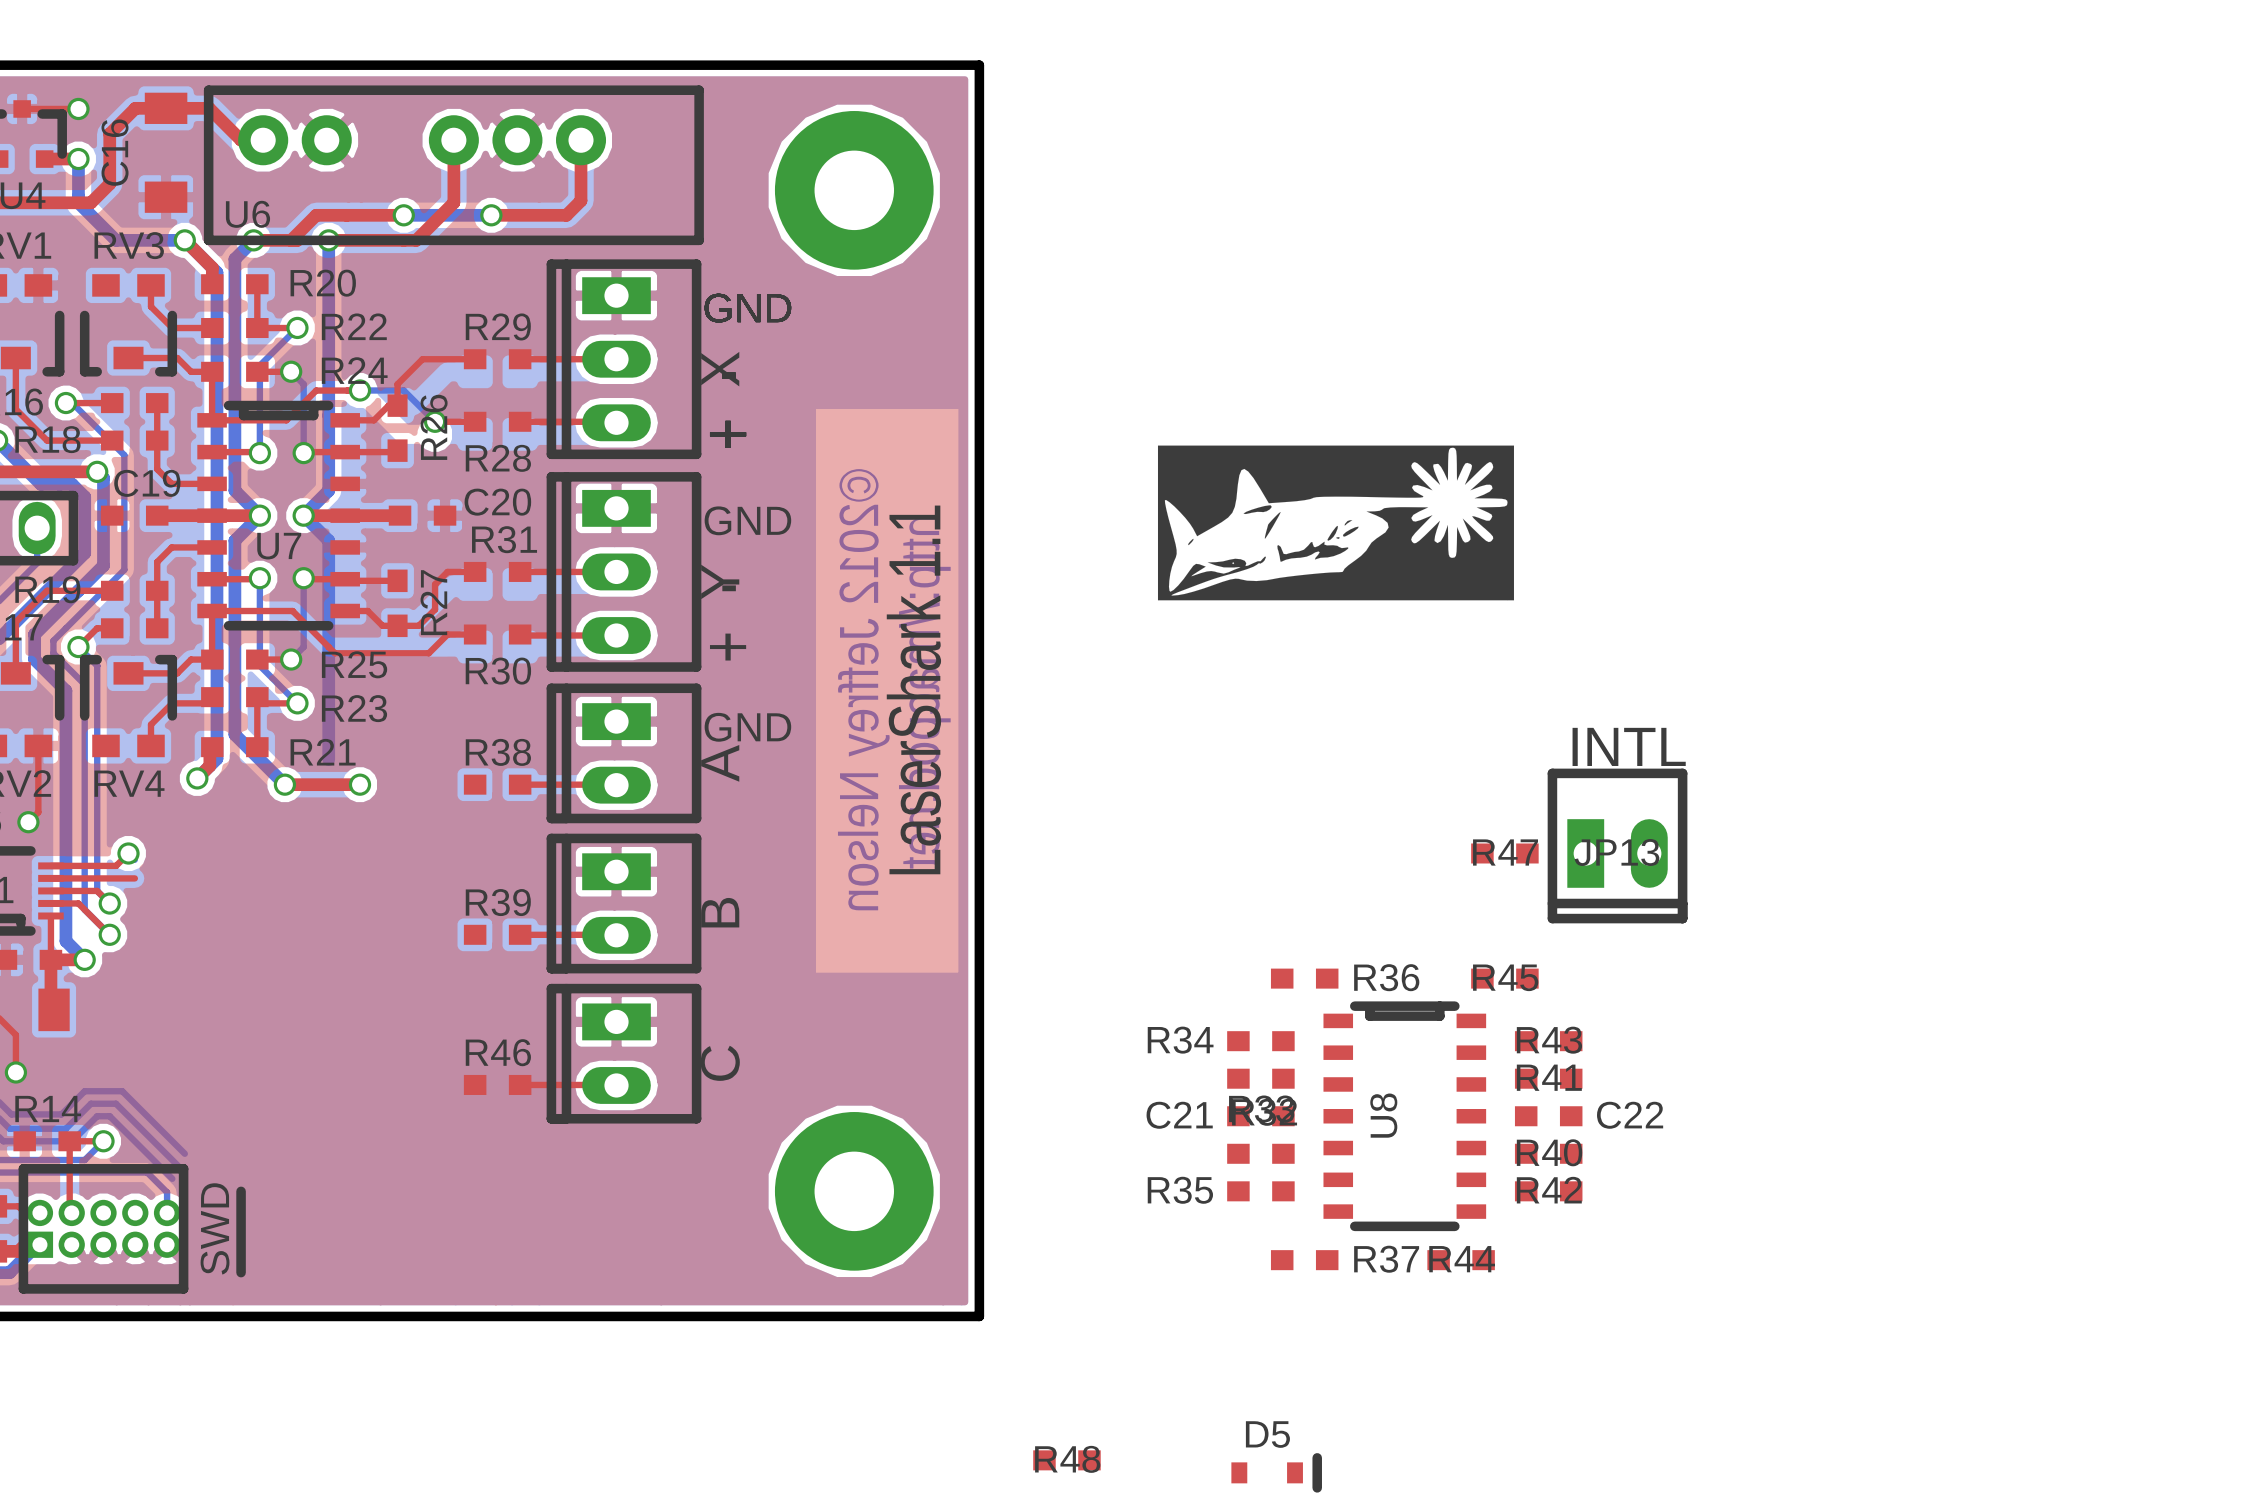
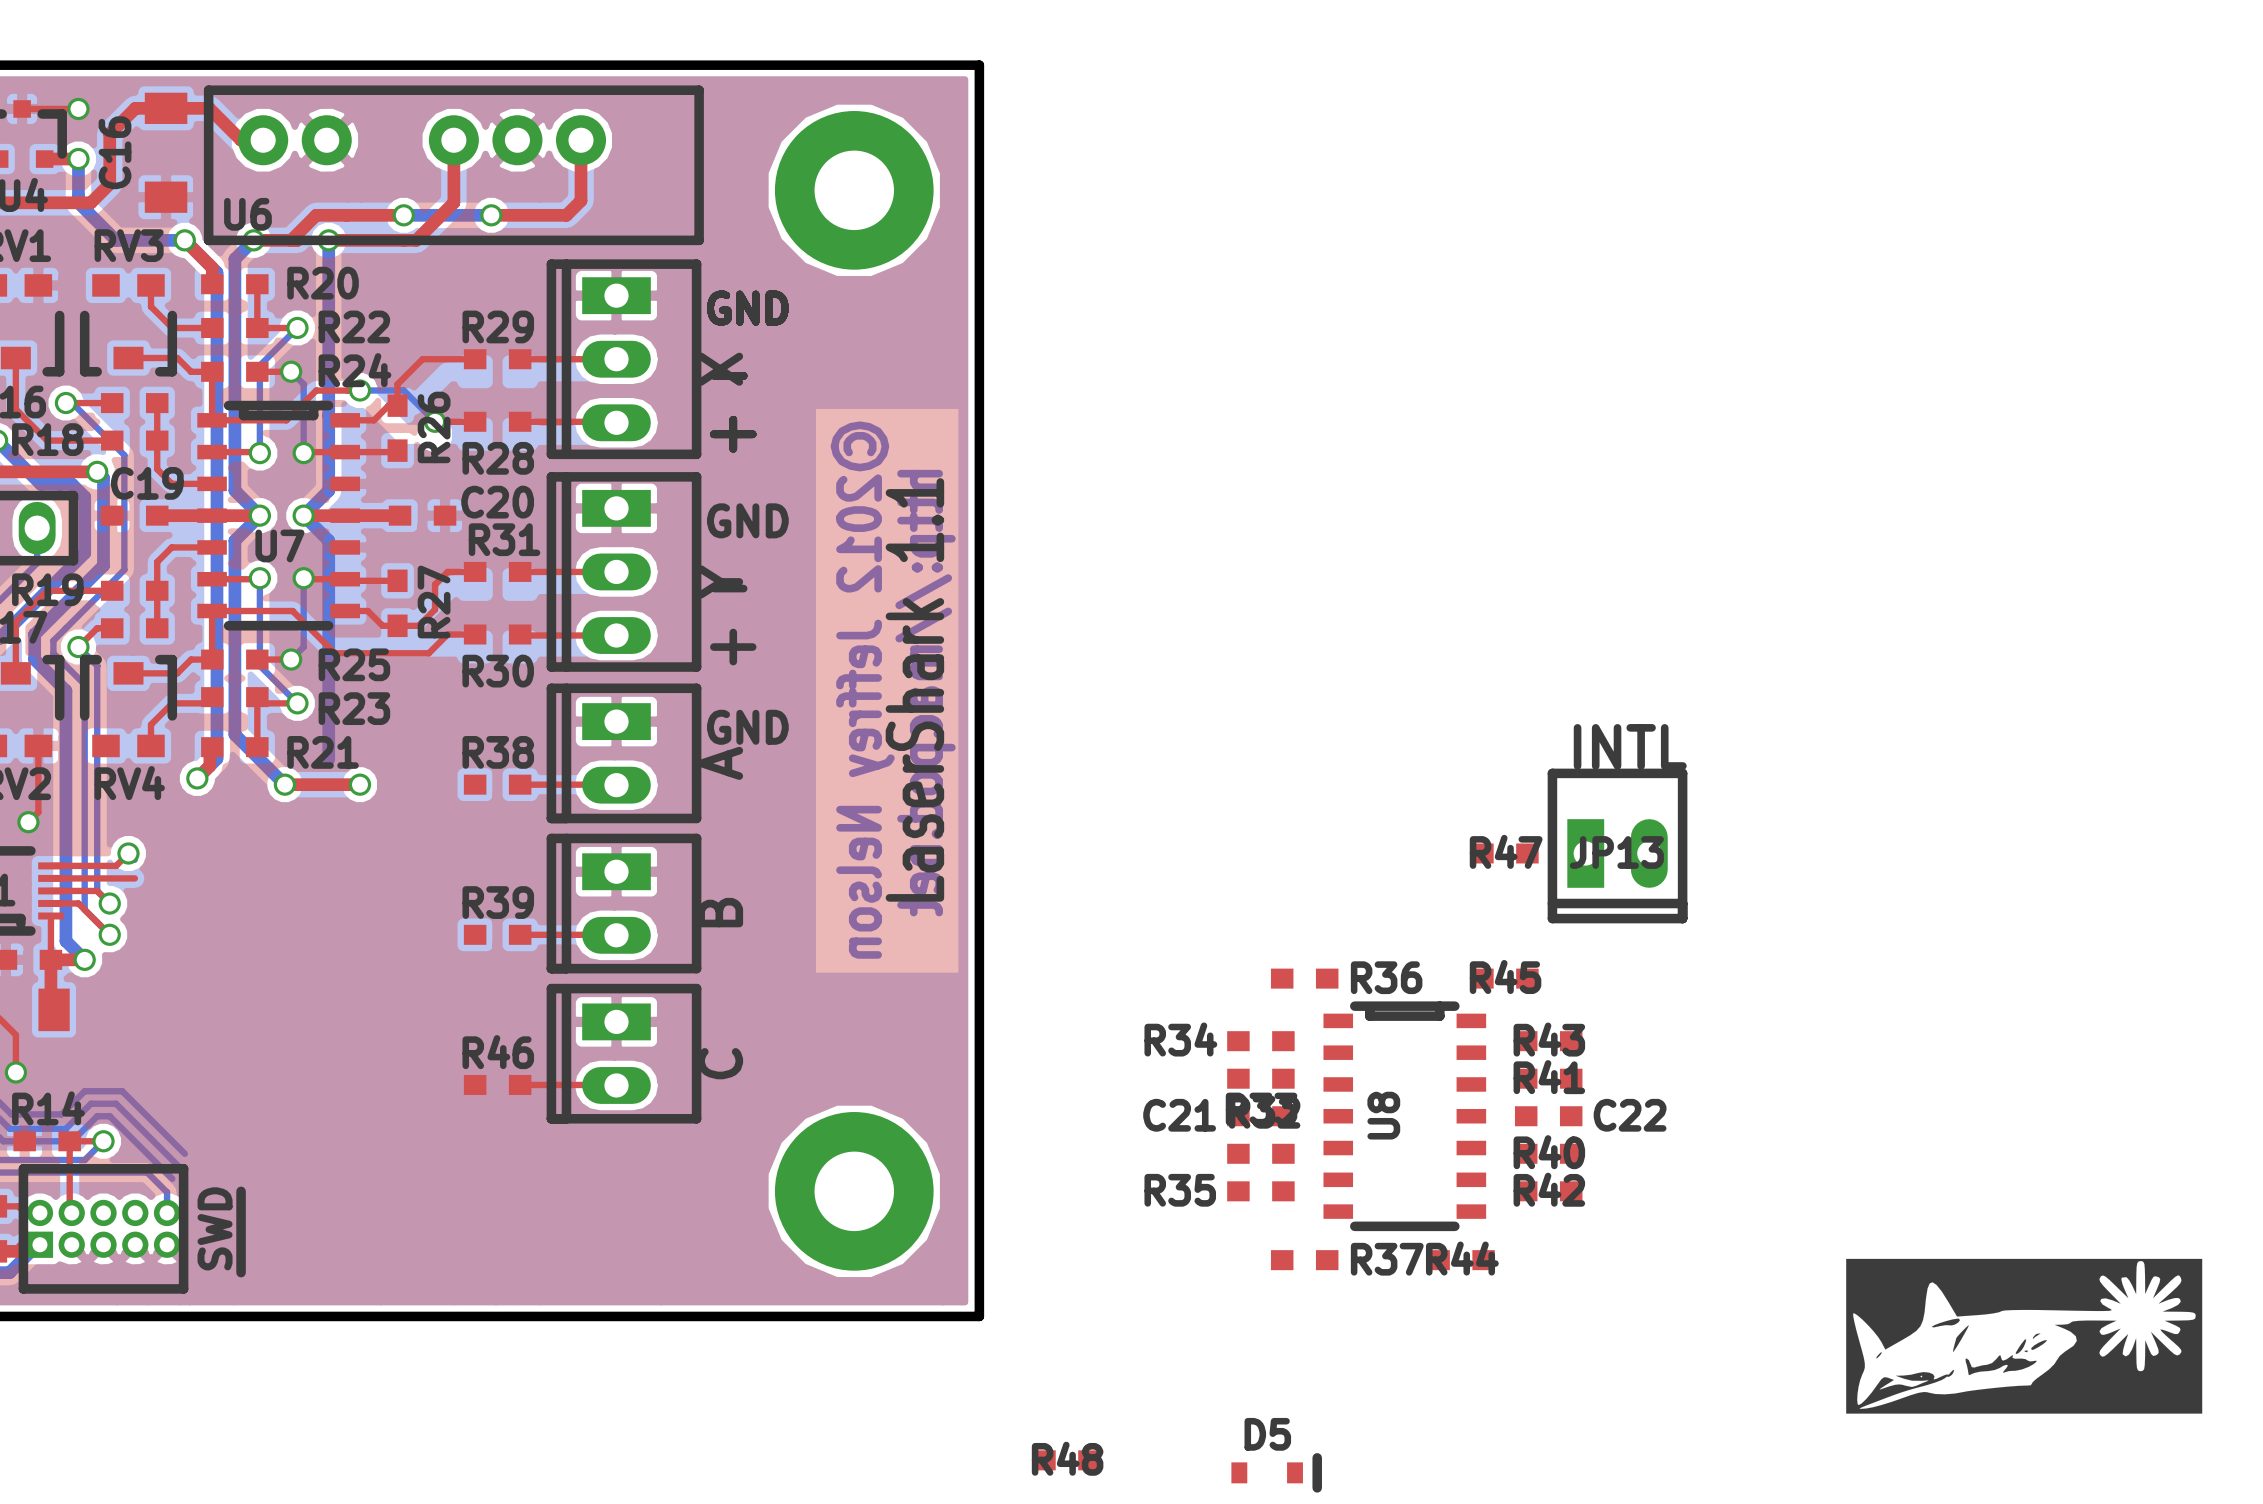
drawing: [1157, 445, 1515, 601] -> none
drawing: none -> [1846, 1258, 2203, 1414]

